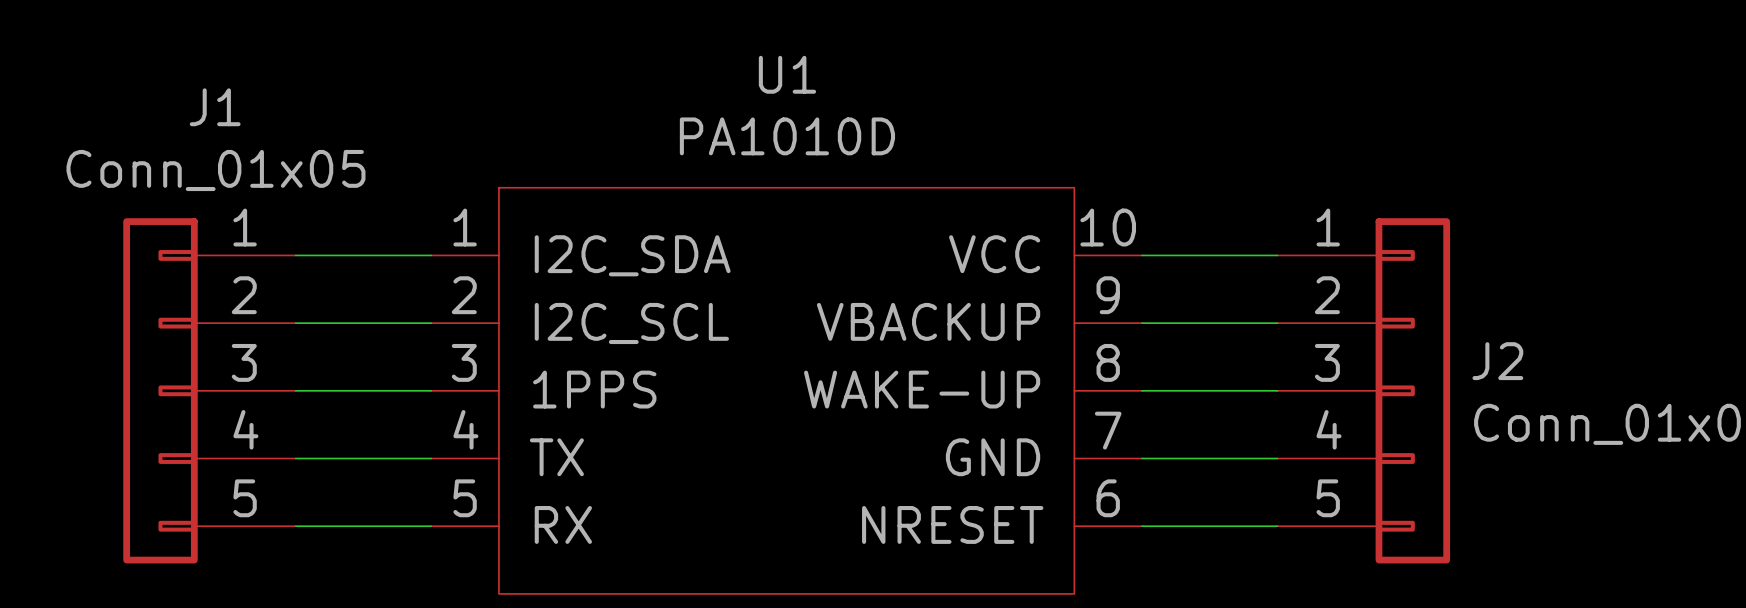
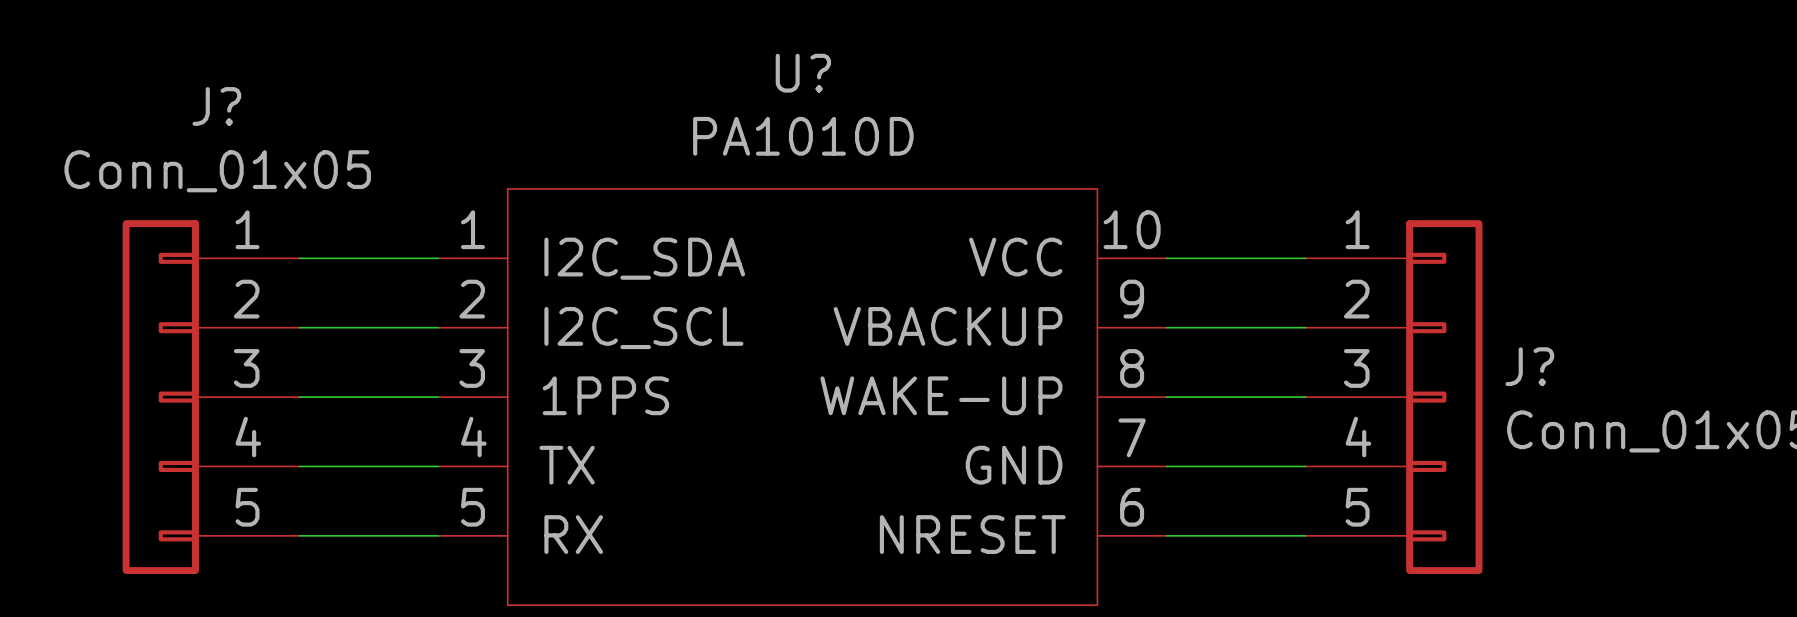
U1 name: U1 (787, 74) -> U? (803, 73)
J1 name: J1 (215, 107) -> J? (216, 106)
J2 name: J2 (1497, 361) -> J? (1529, 366)

